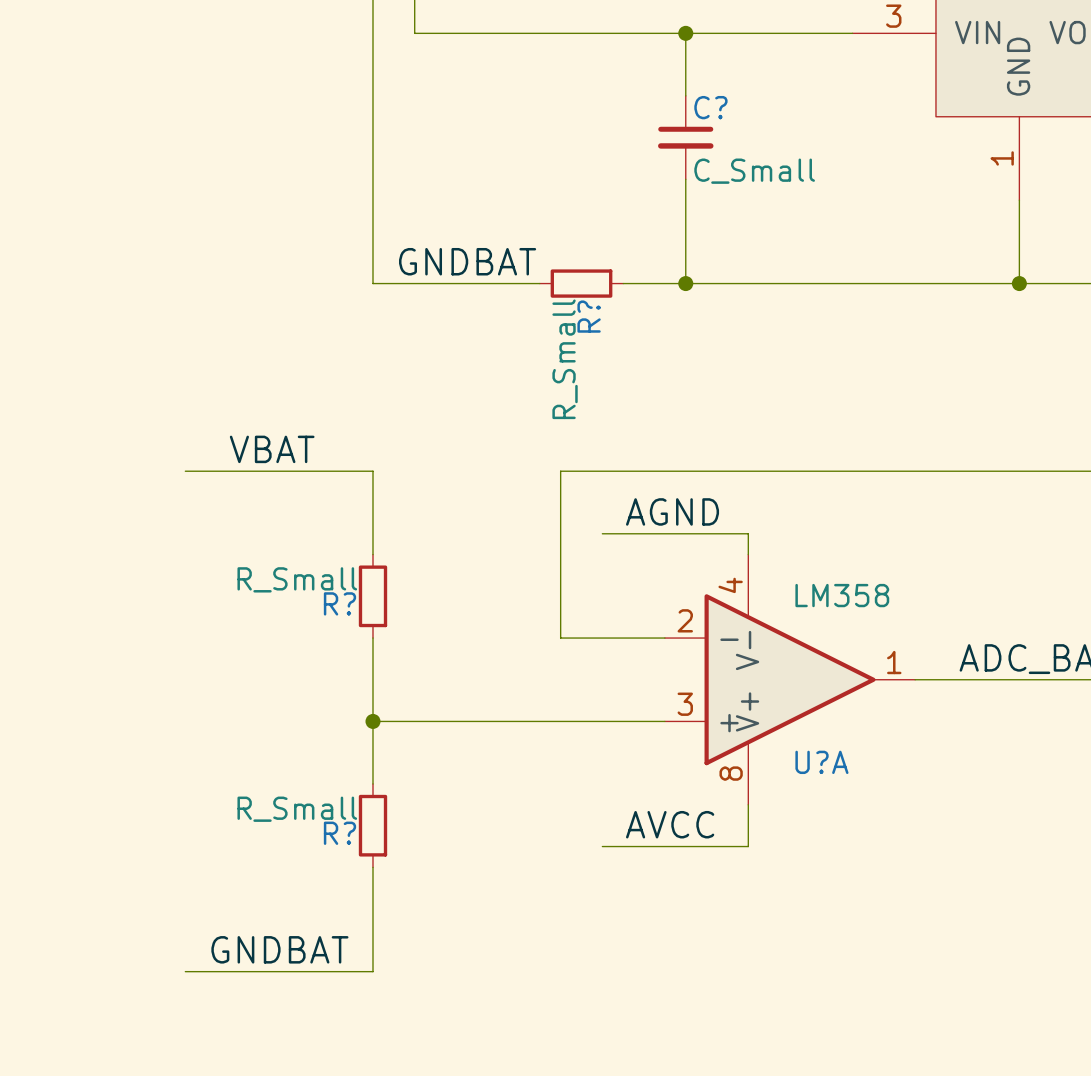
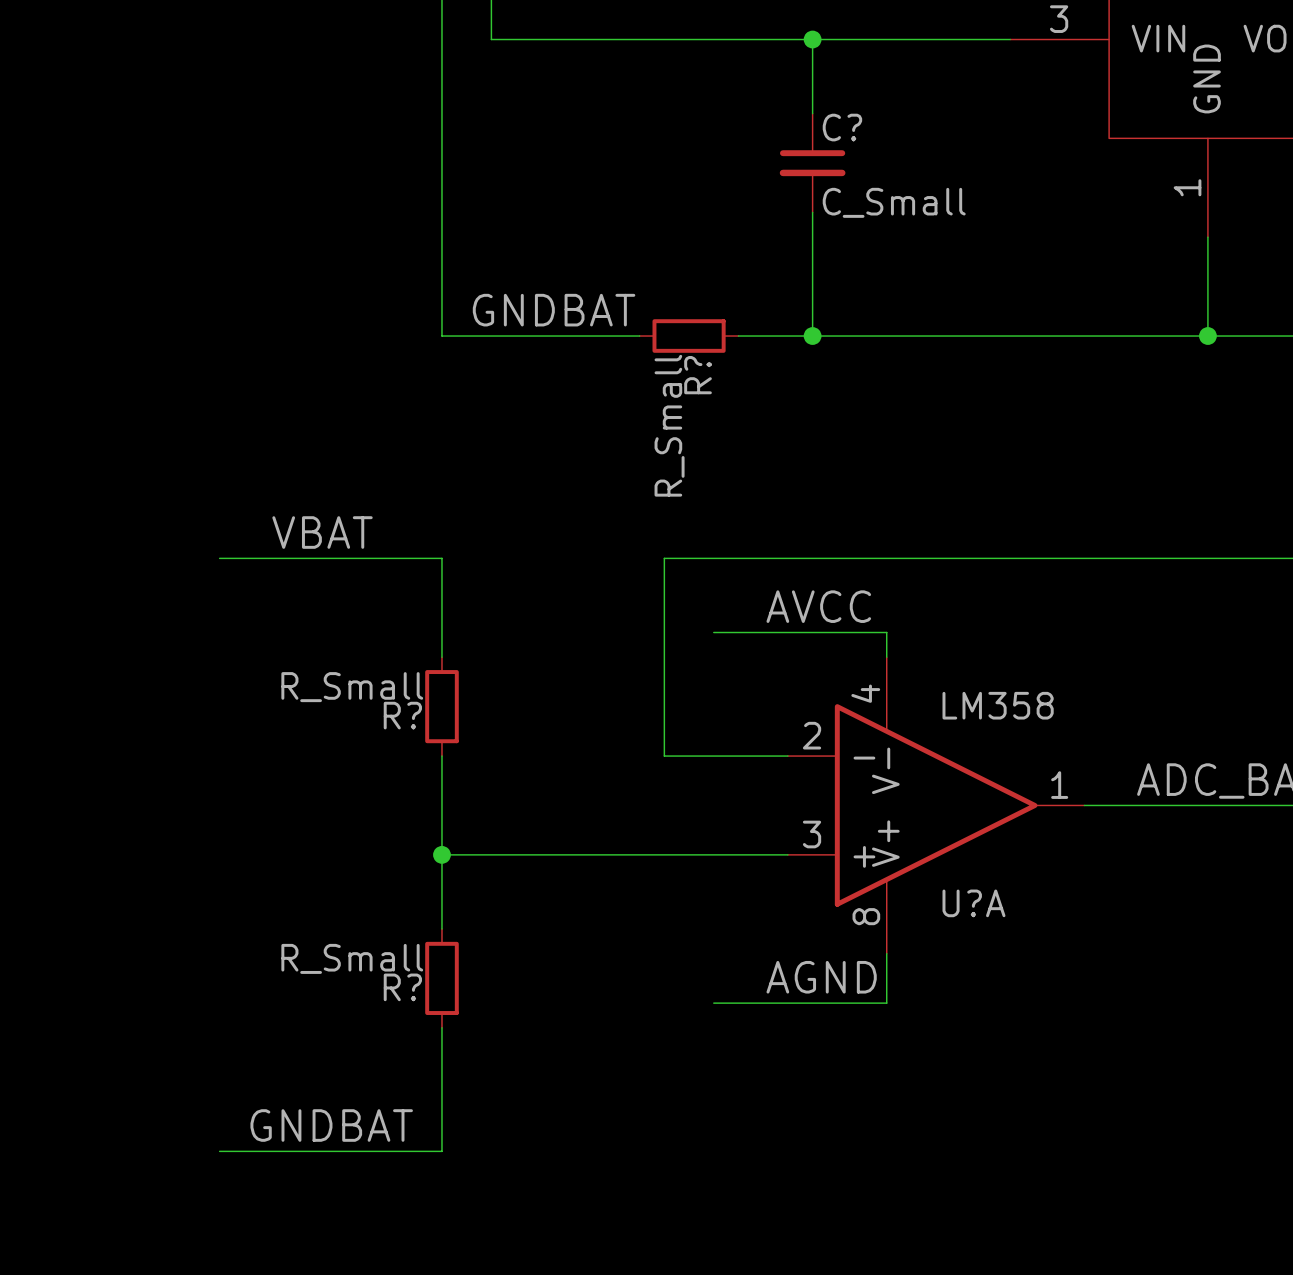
label position: AGND (672, 511) -> AGND (821, 977)
label position: AVCC (670, 824) -> AVCC (818, 606)

